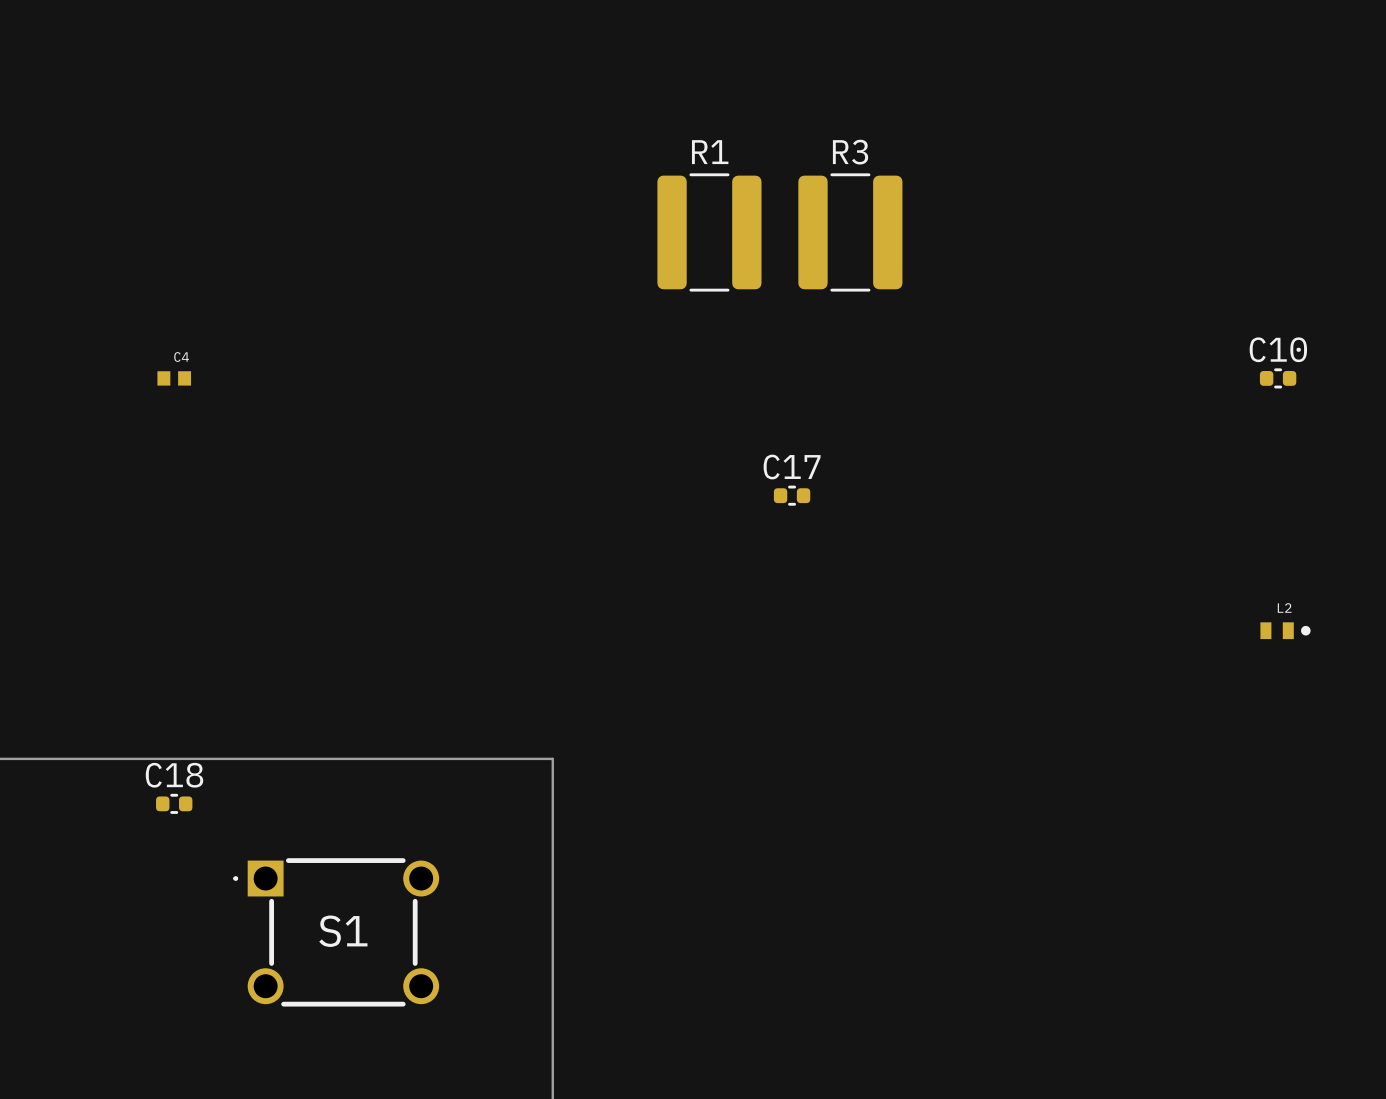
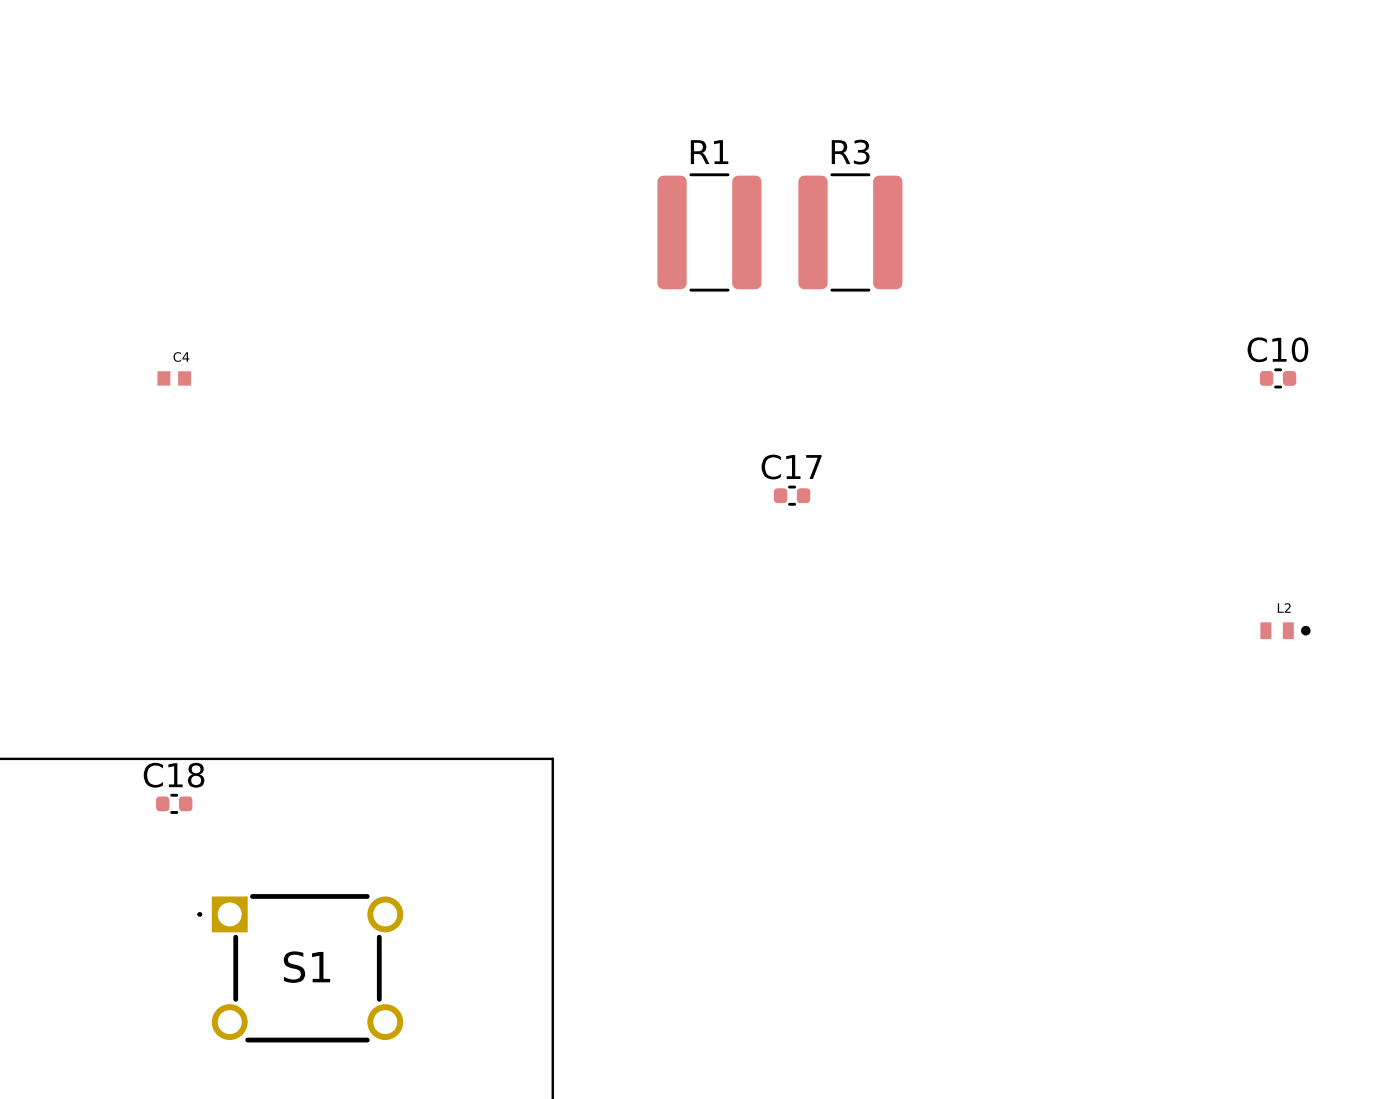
S1 position: (336, 932) -> (300, 968)

